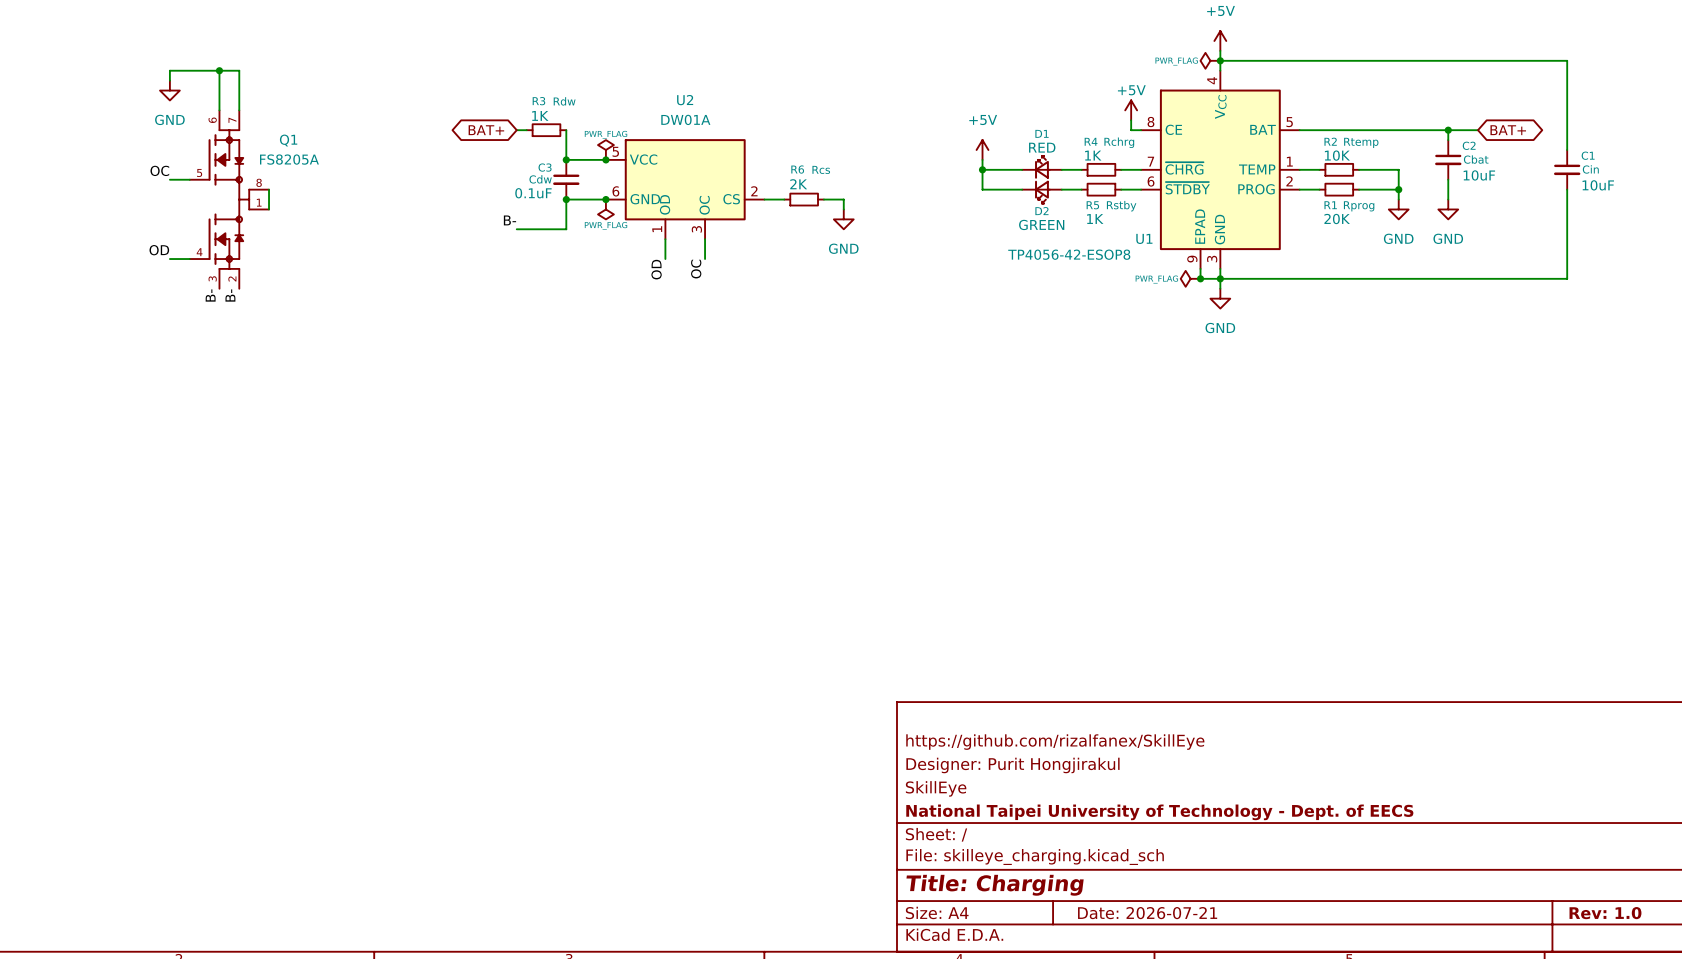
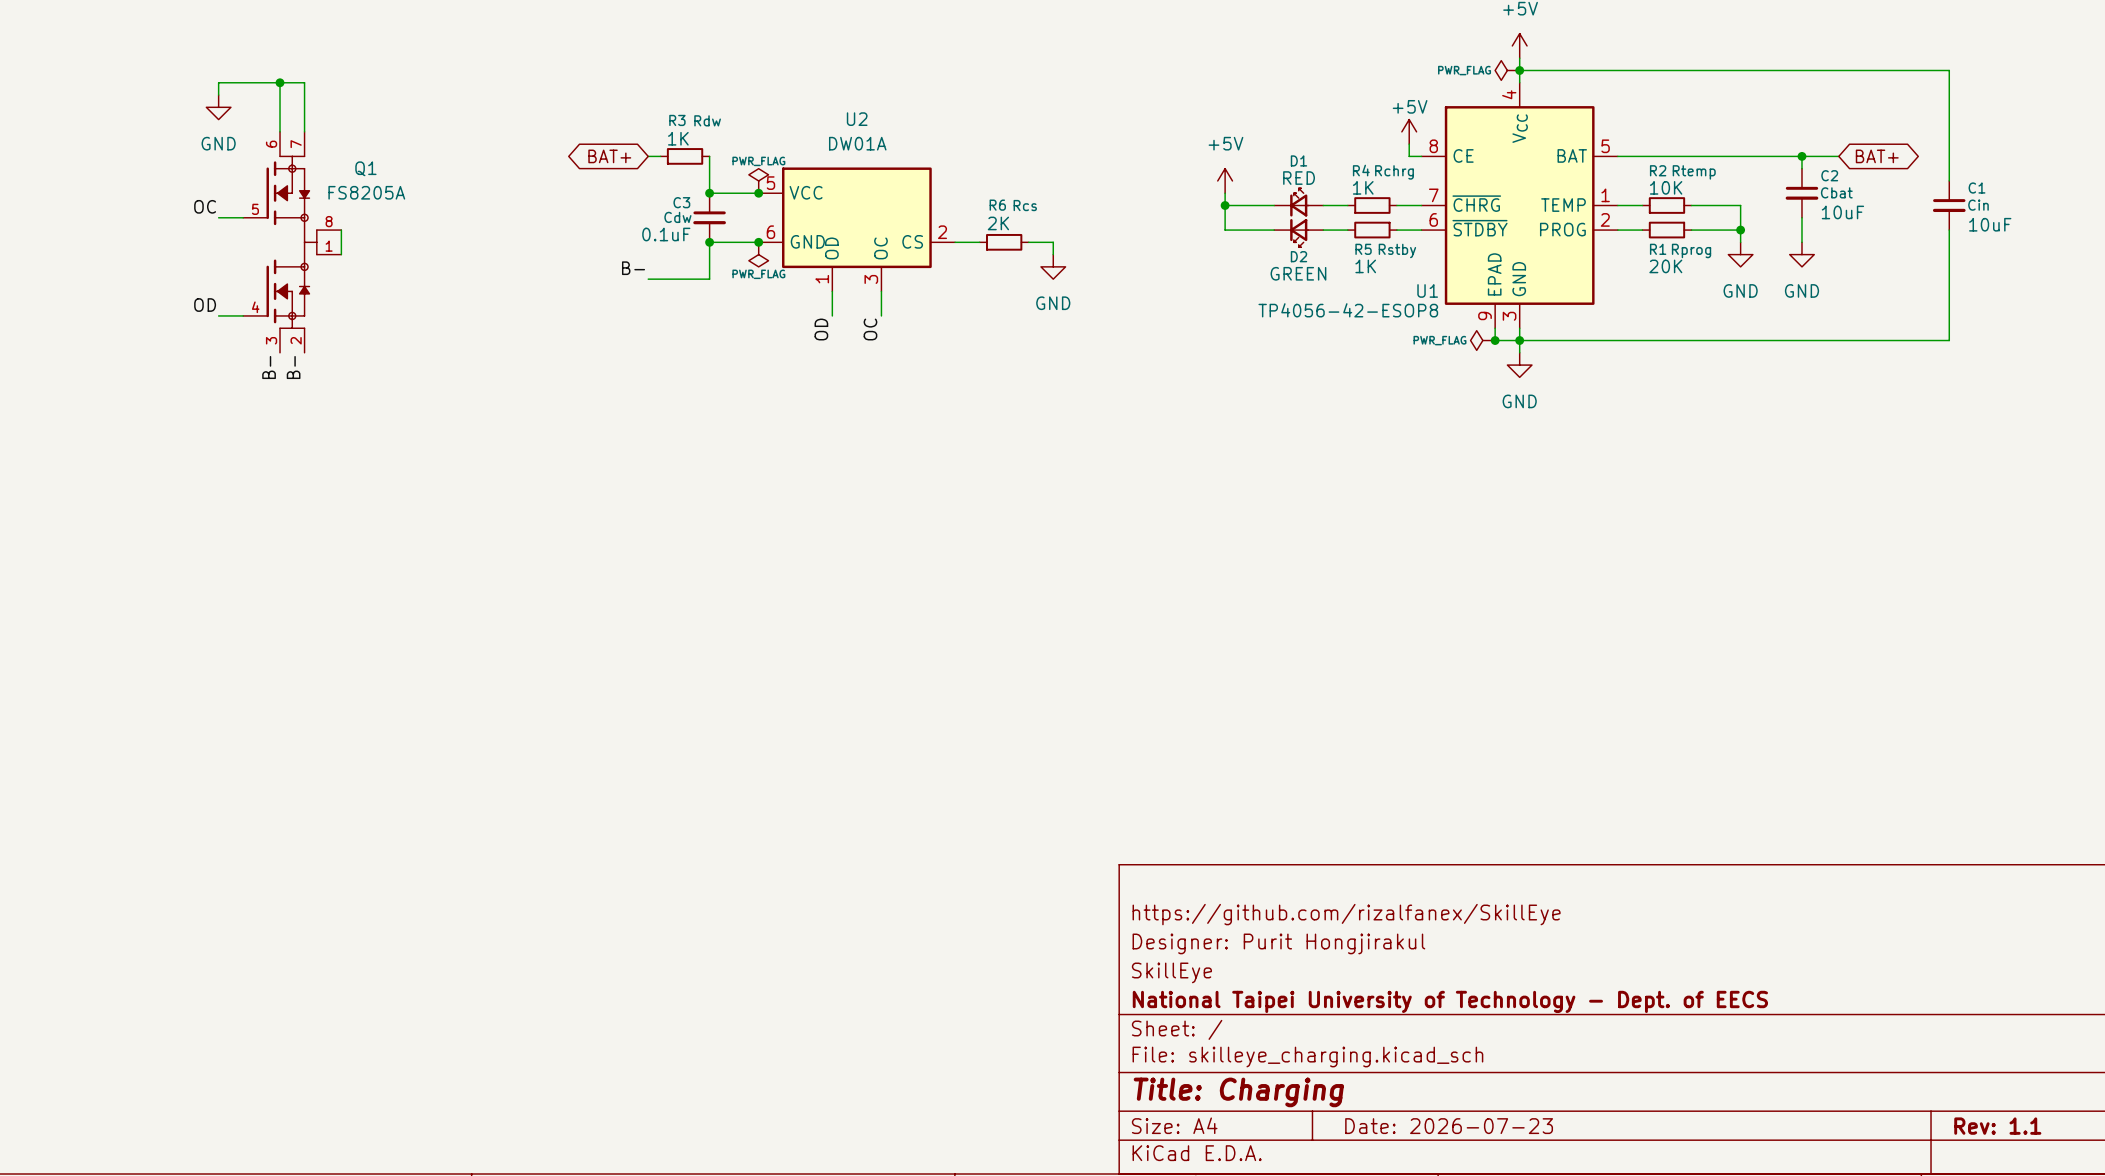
title block: Date: 2026-07-21 (1147, 913) -> Date: 2026-07-23 (1449, 1126)
title block: Rev: 1.0 (1605, 913) -> Rev: 1.1 (1997, 1126)

